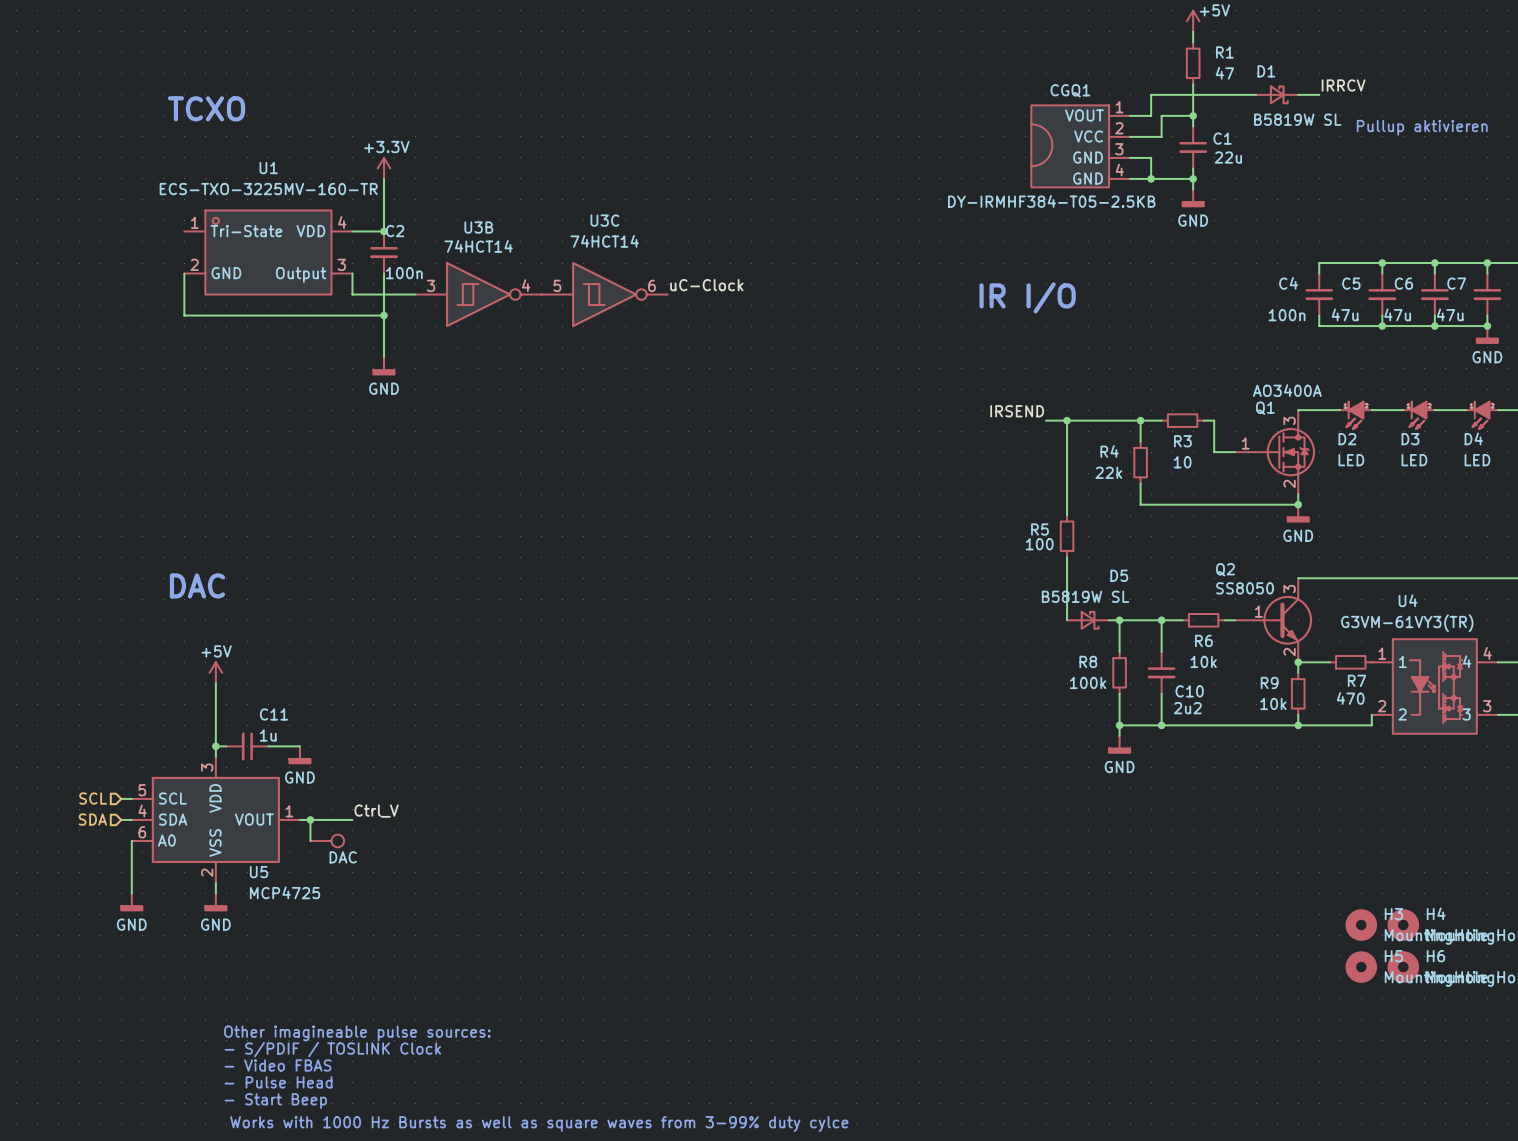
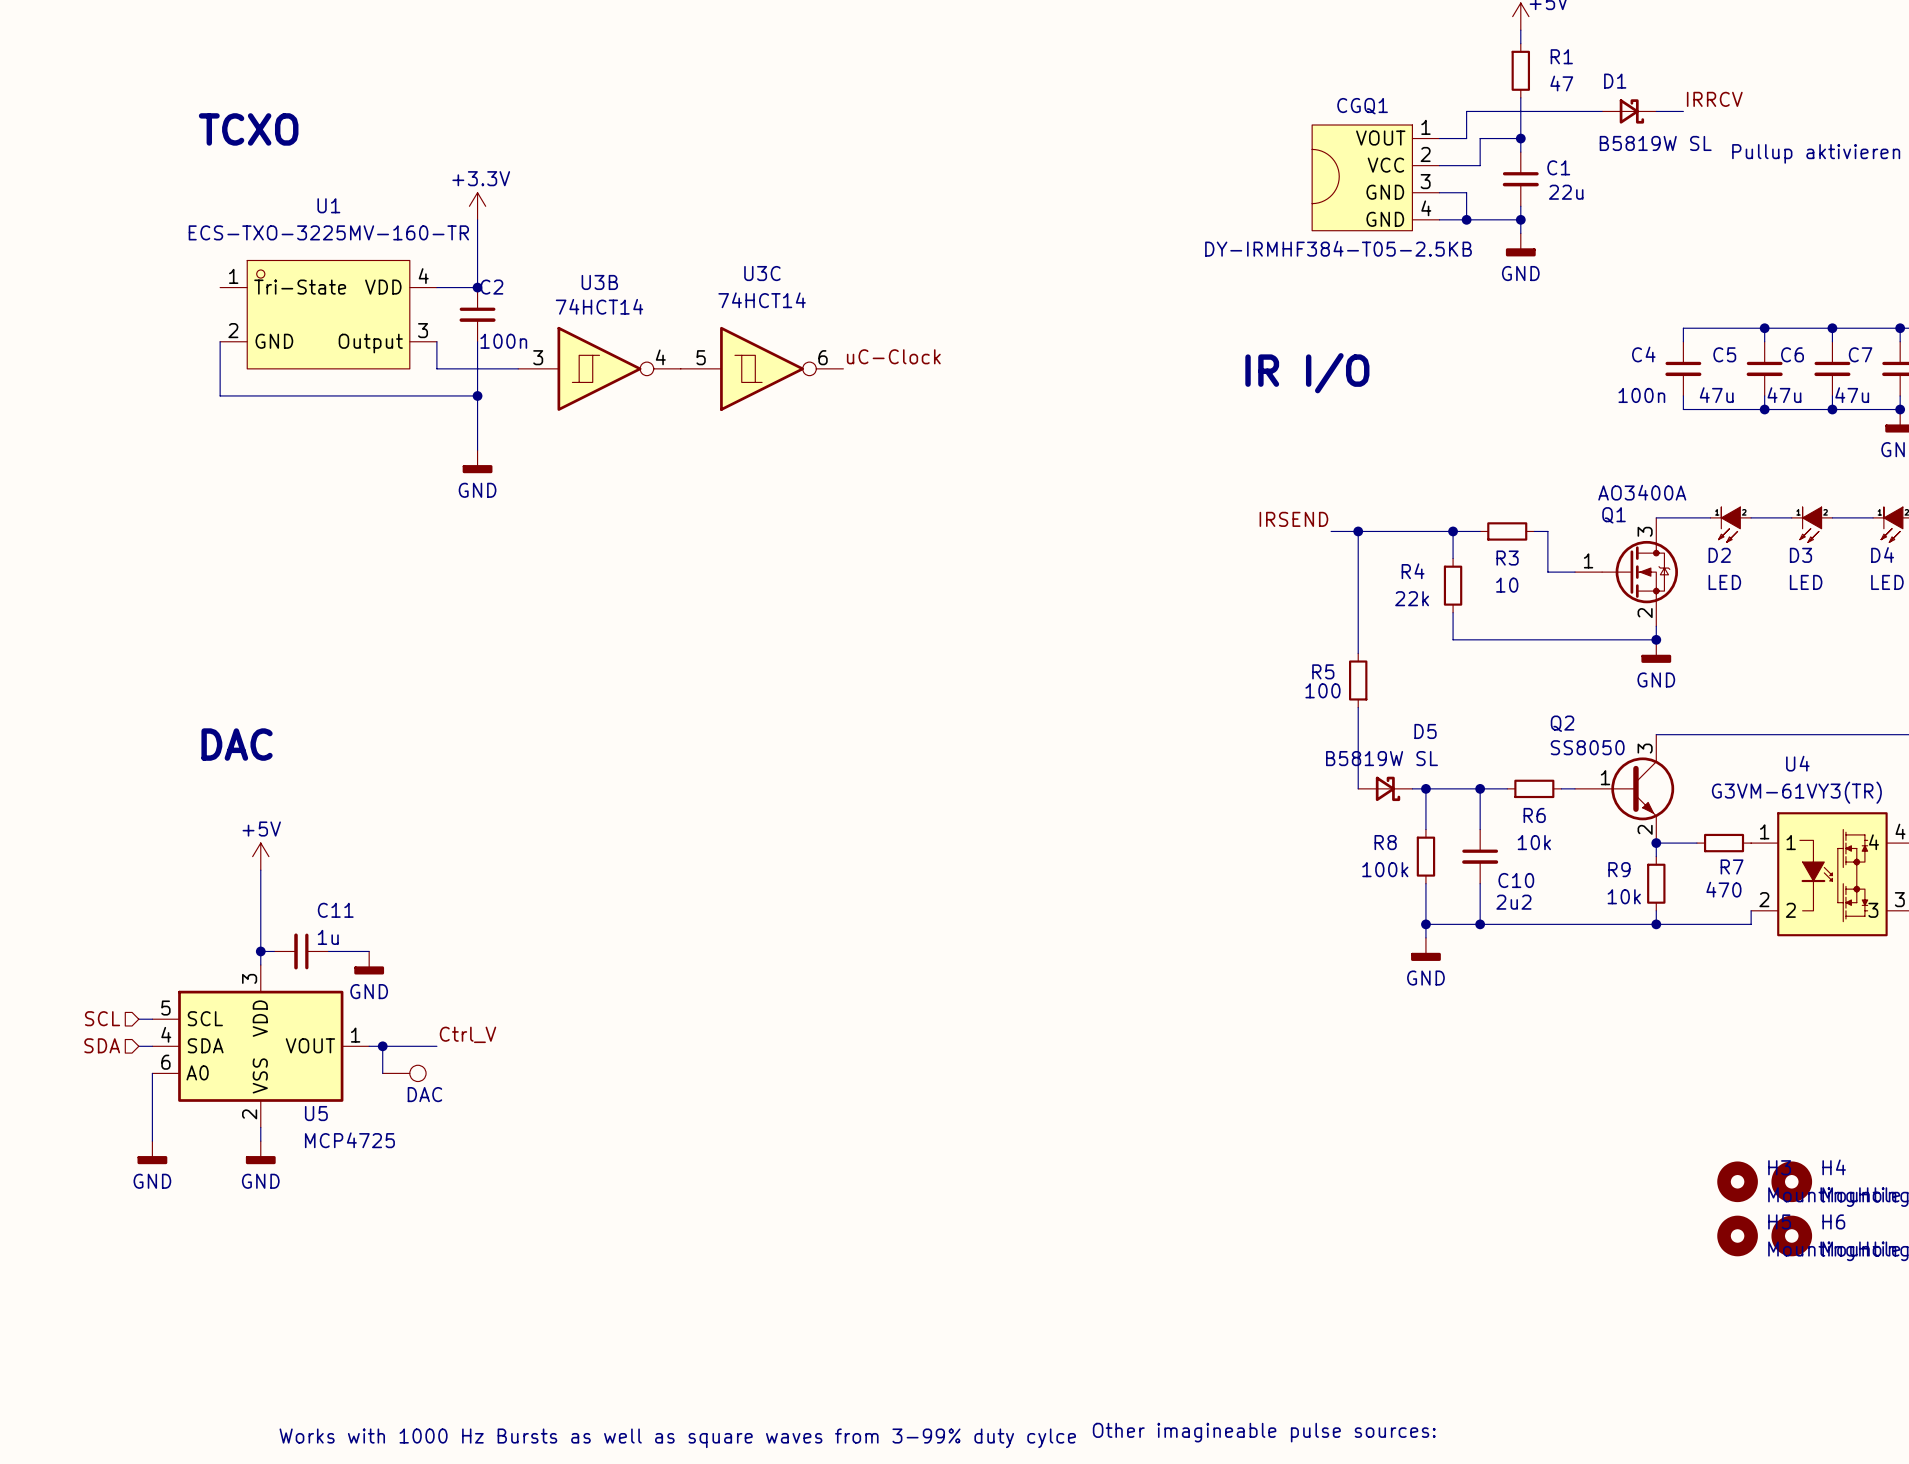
text: Other imagineable pulse sources: (357, 1033) -> none
text: - S/PDIF / TOSLINK Clock (332, 1049) -> none
text: - Video FBAS (278, 1065) -> none
text: - Pulse Head (278, 1082) -> none
text: - Start Beep (275, 1101) -> none
text: none -> Other imagineable pulse sources: (1264, 1432)

